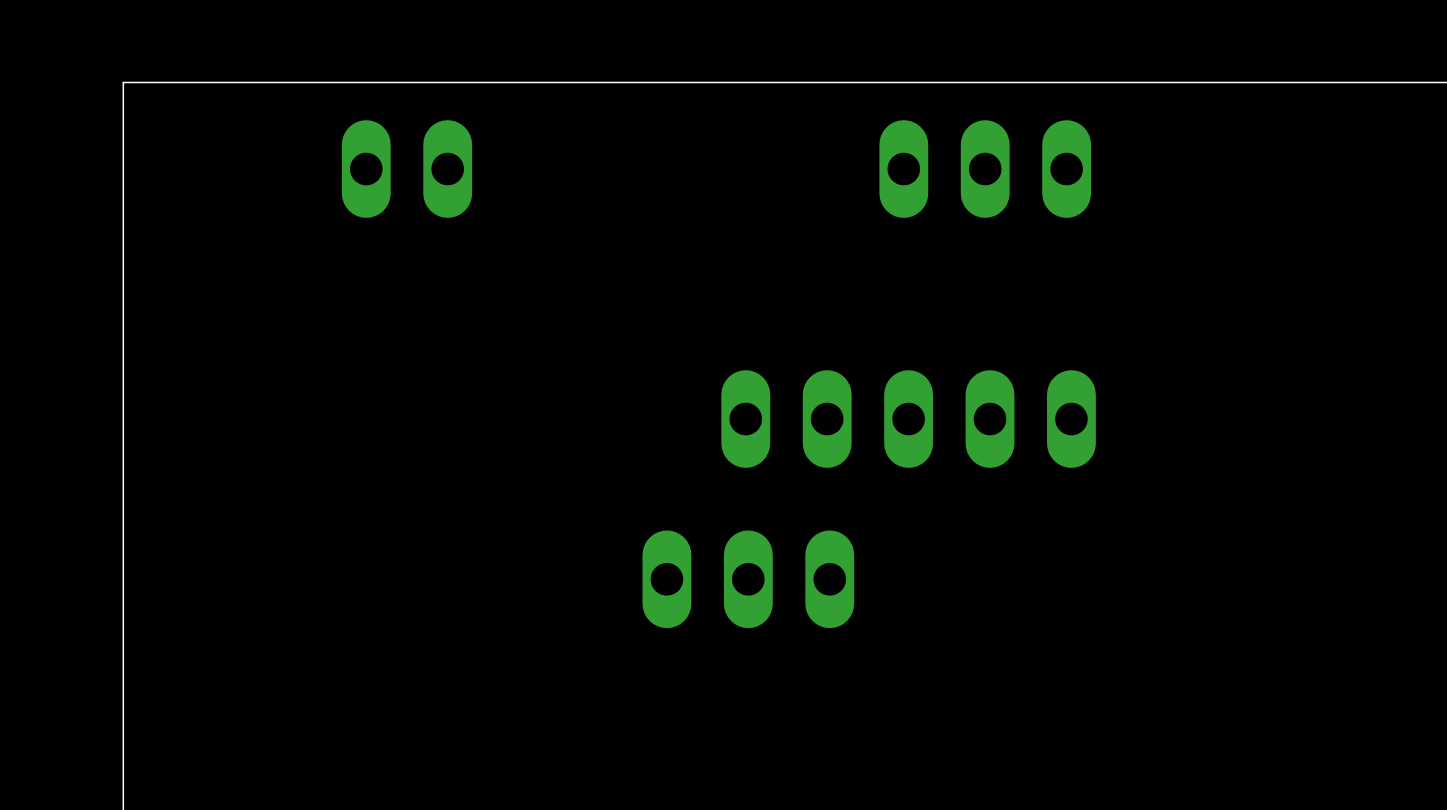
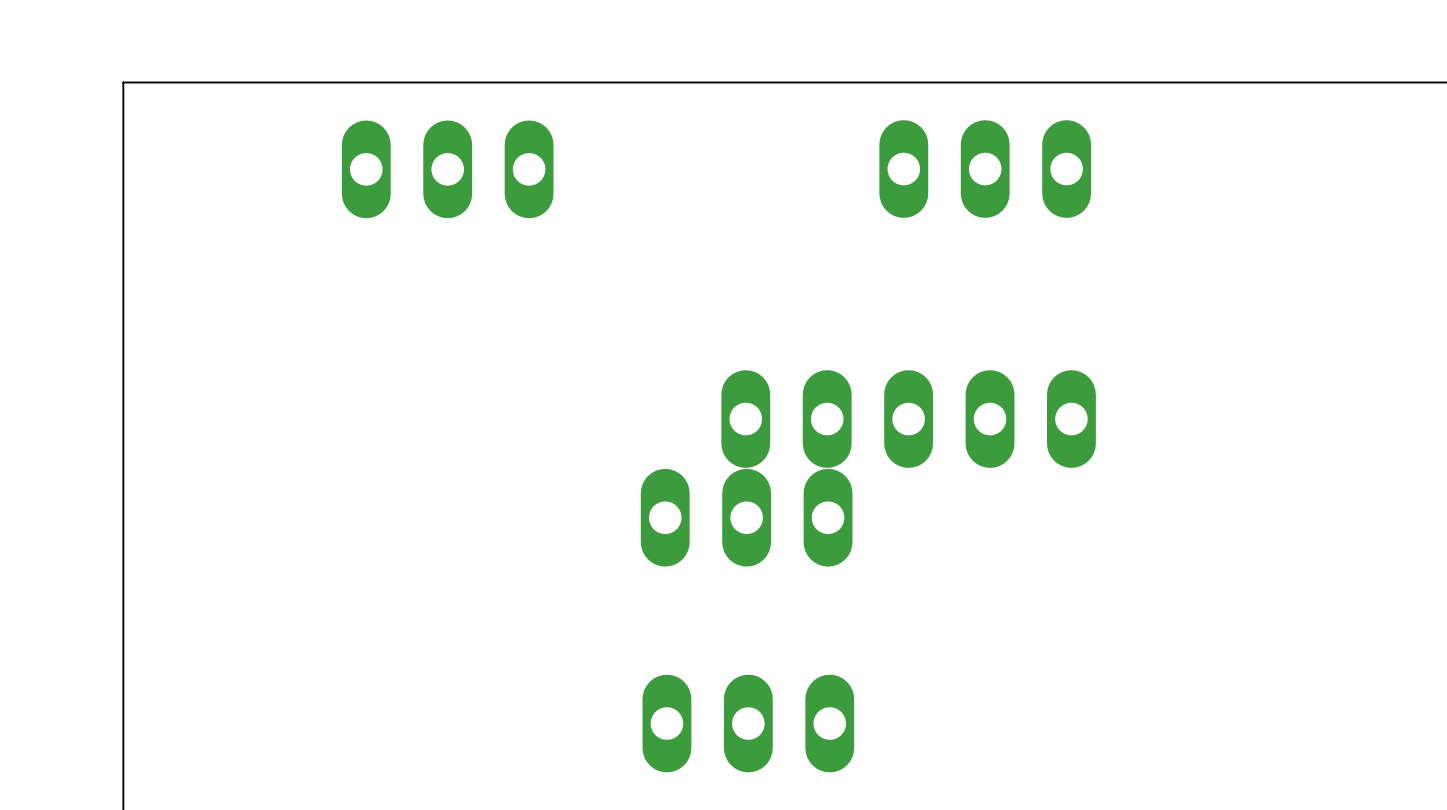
part: (406, 169) -> none
part: none -> (447, 169)
part position: (748, 579) -> (746, 517)
part: none -> (748, 723)

